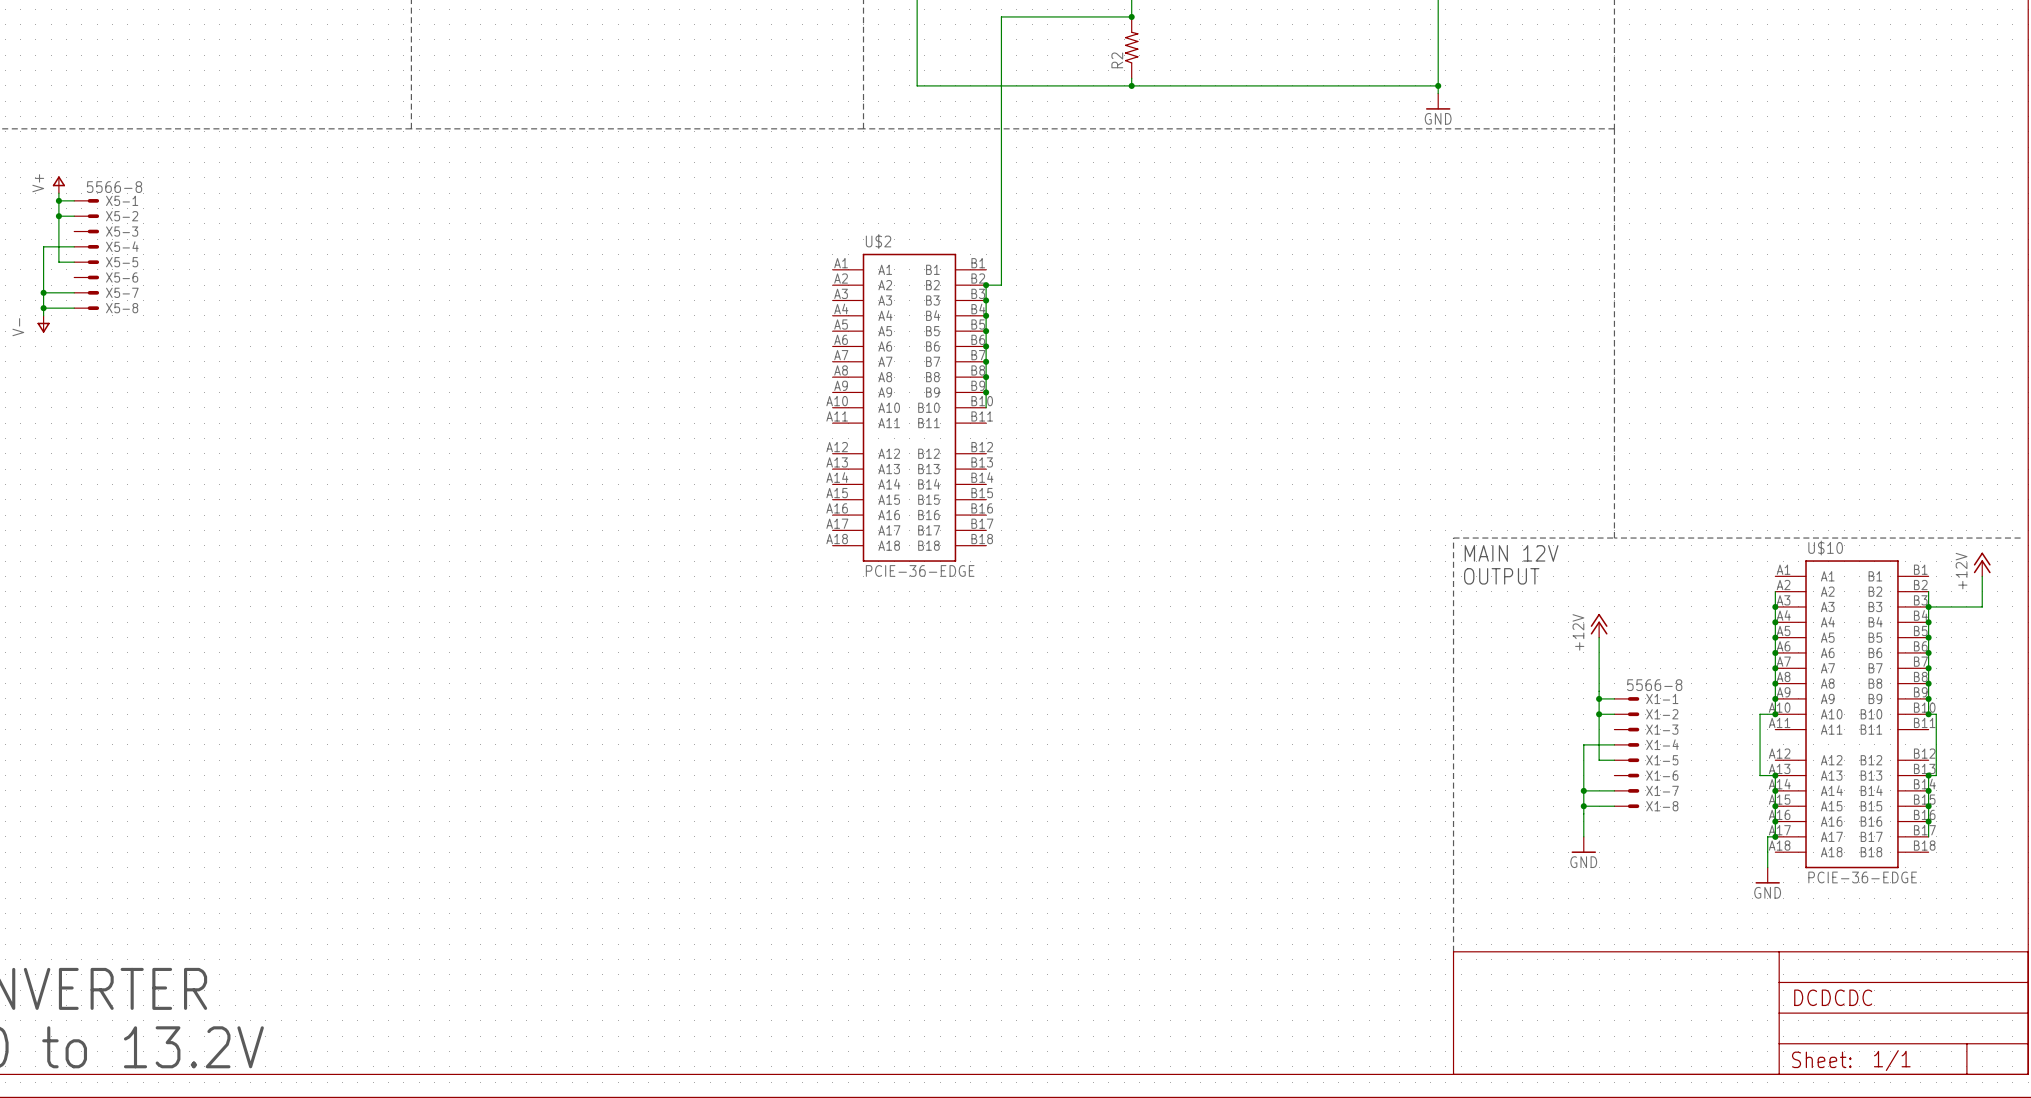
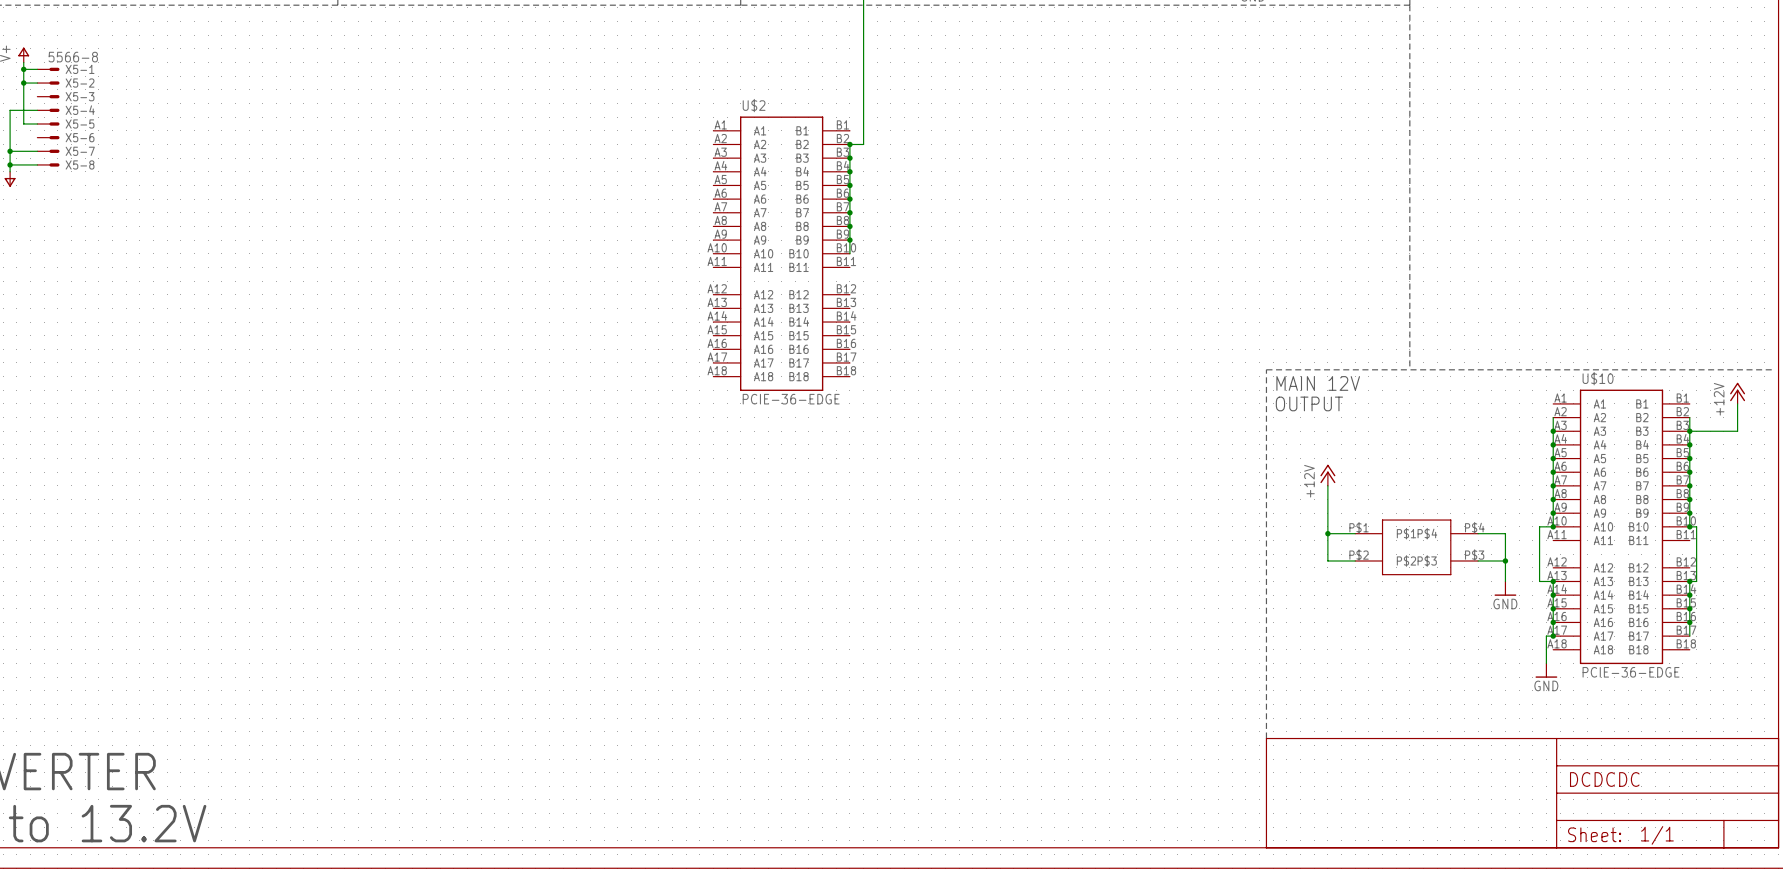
power symbol position: +12V (1599, 625) -> +12V (1327, 475)
wire: (1599, 637) (1599, 760) (1614, 760) -> none
wire: none -> (1327, 485) (1327, 560) (1355, 560)
wire: (1599, 698) (1614, 698) -> none
junction: (1599, 698) -> none
X1-1: 5566-8 (1626, 698) -> none
wire: (1599, 714) (1614, 714) -> none
junction: (1599, 714) -> none
X1-2: (1626, 714) -> none
junction: none -> (1327, 533)
wire: none -> (1478, 533) (1505, 533) (1505, 581)
X1-3: (1626, 729) -> none
part: none -> (1416, 547)
wire: (1614, 744) (1583, 744) (1583, 836) -> none
X1-4: (1626, 744) -> none
junction: none -> (1505, 560)
X1-5: (1626, 760) -> none
X1-6: (1626, 775) -> none
power symbol: none -> GND (1505, 588)
wire: (1583, 790) (1614, 790) -> (1327, 533) (1355, 533)
junction: (1583, 790) -> none
X1-7: (1626, 790) -> none
wire: (1583, 806) (1614, 806) -> (1478, 560) (1505, 560)
junction: (1583, 806) -> none
X1-8: (1626, 806) -> none
power symbol: GND (1583, 844) -> none

